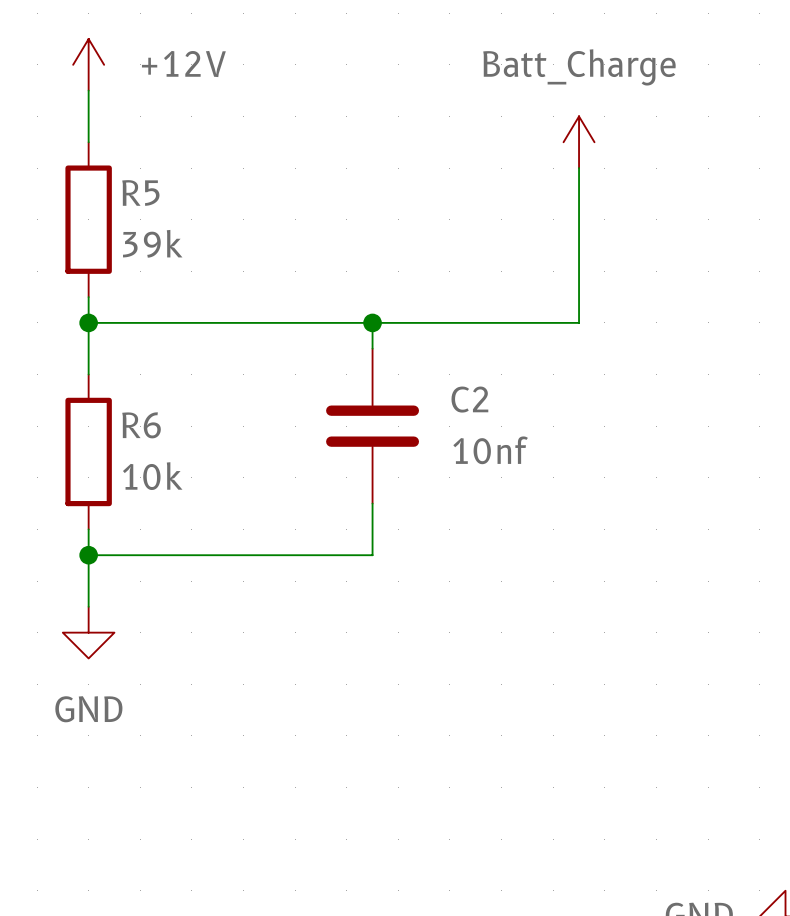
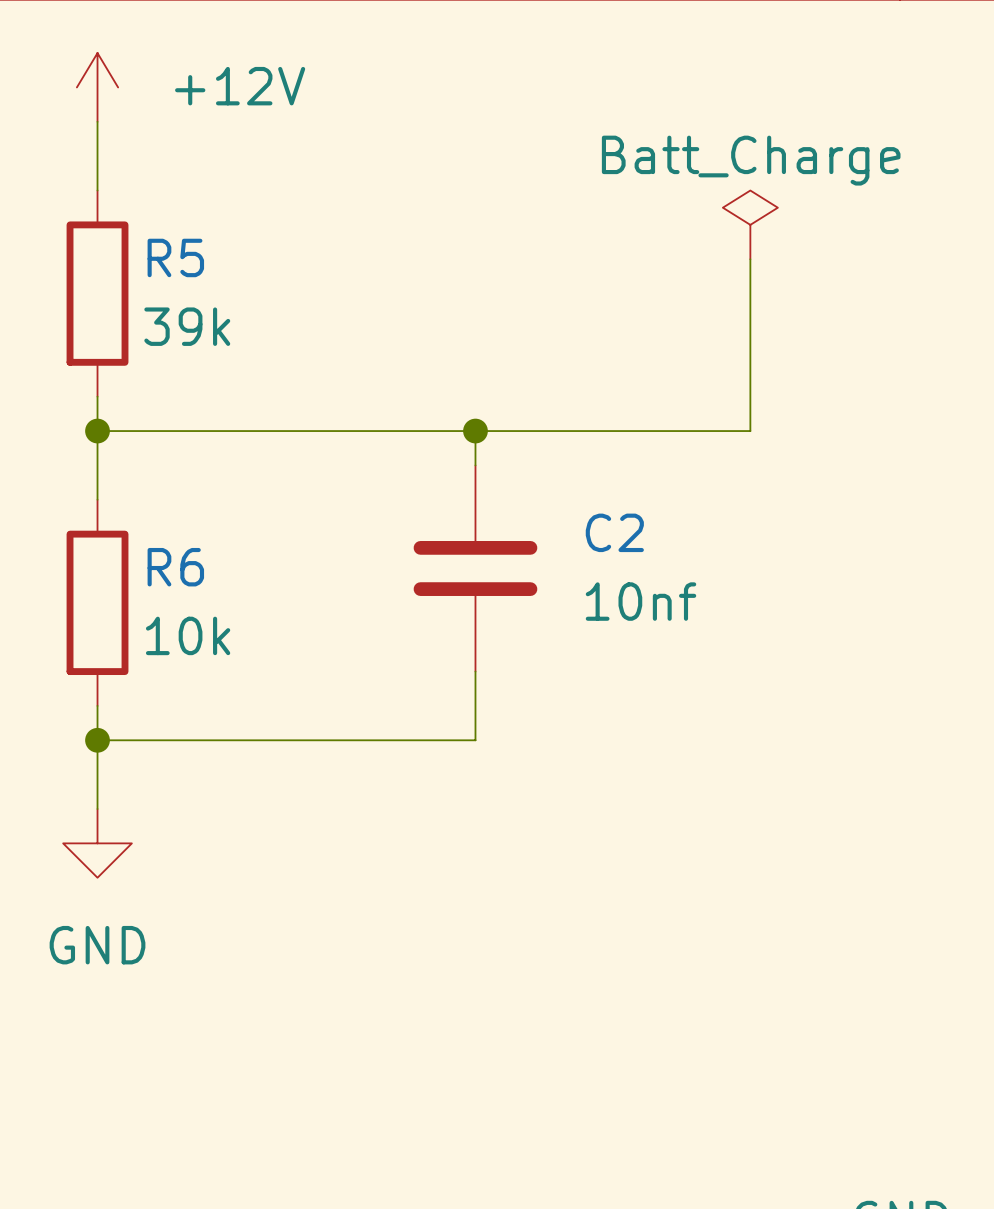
power symbol: Batt_Charge (579, 142) -> none
power symbol: none -> Batt_Charge (750, 224)

